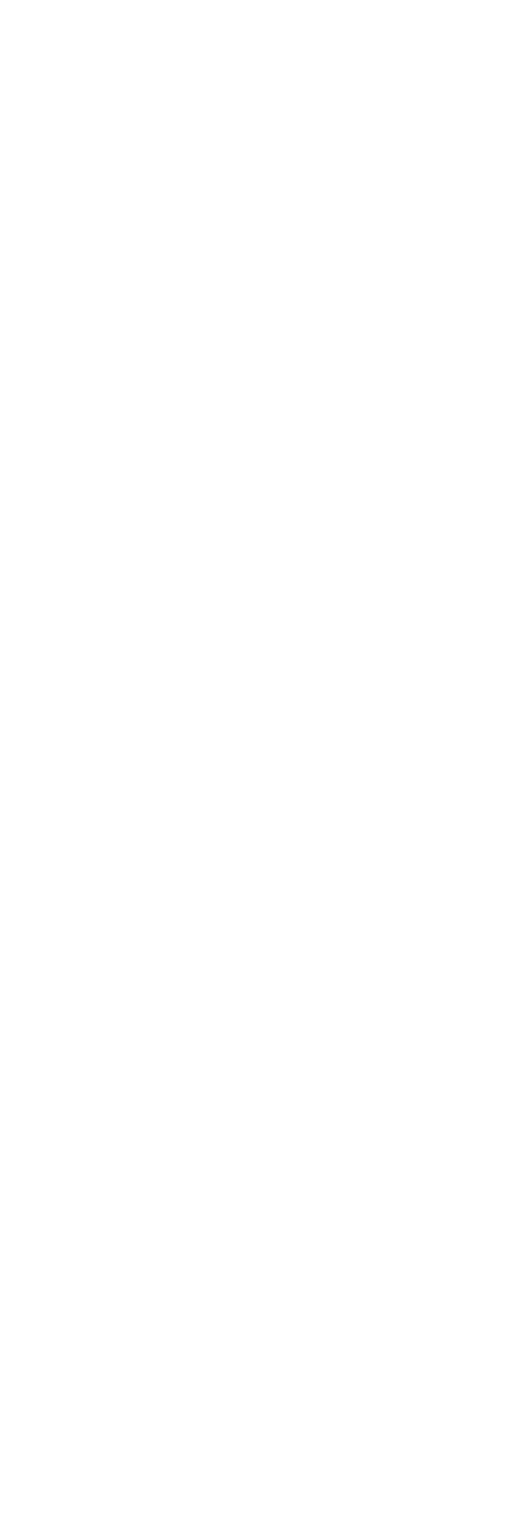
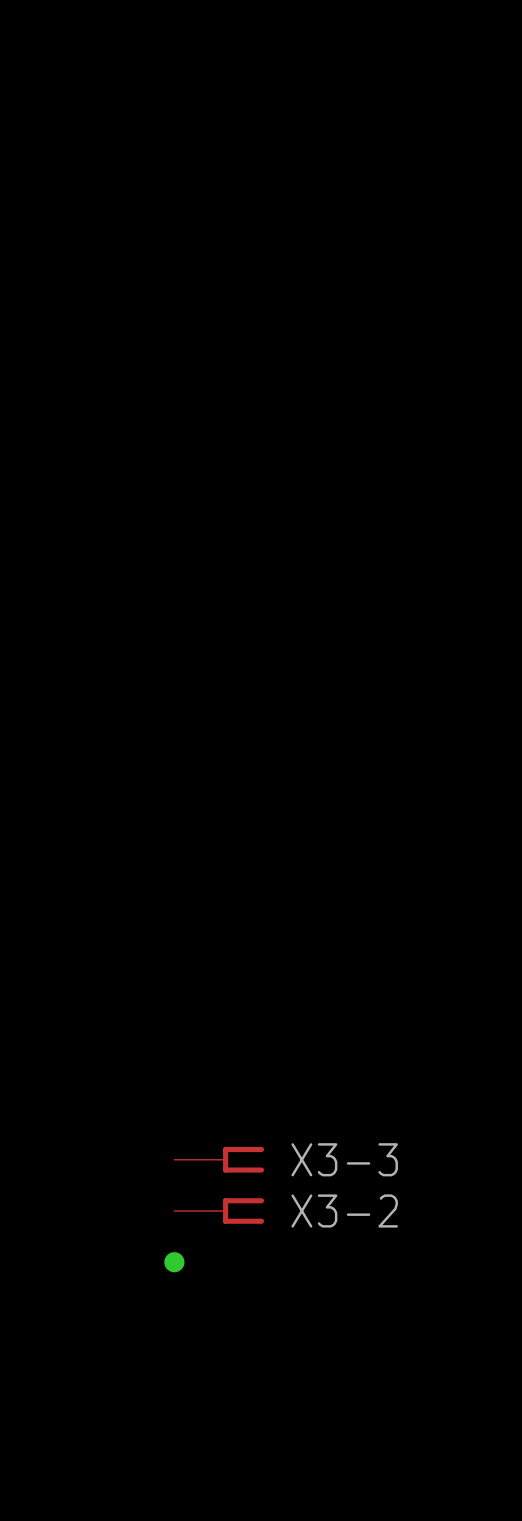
X3-3: none -> (219, 1159)
X3-2: none -> (219, 1211)
junction: none -> (174, 1262)

